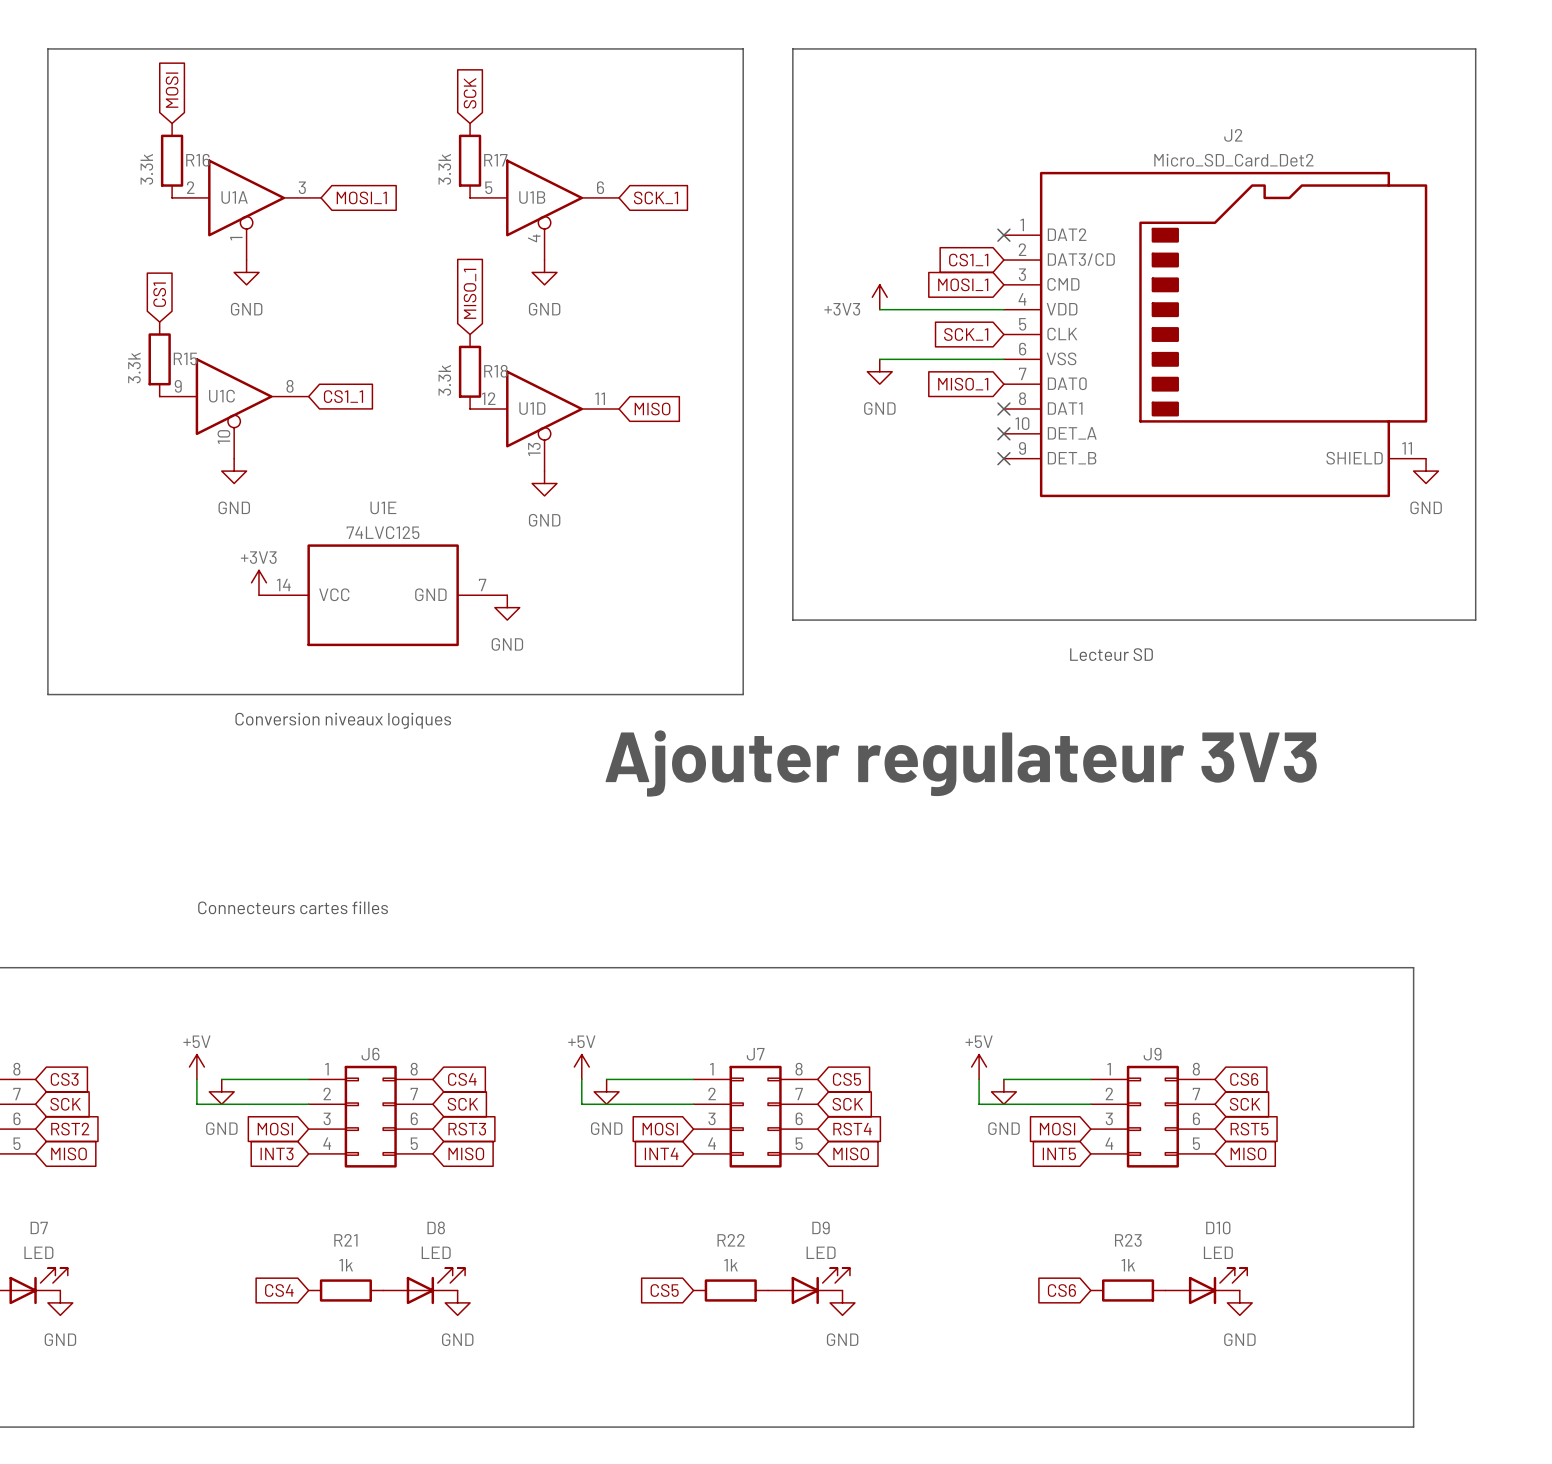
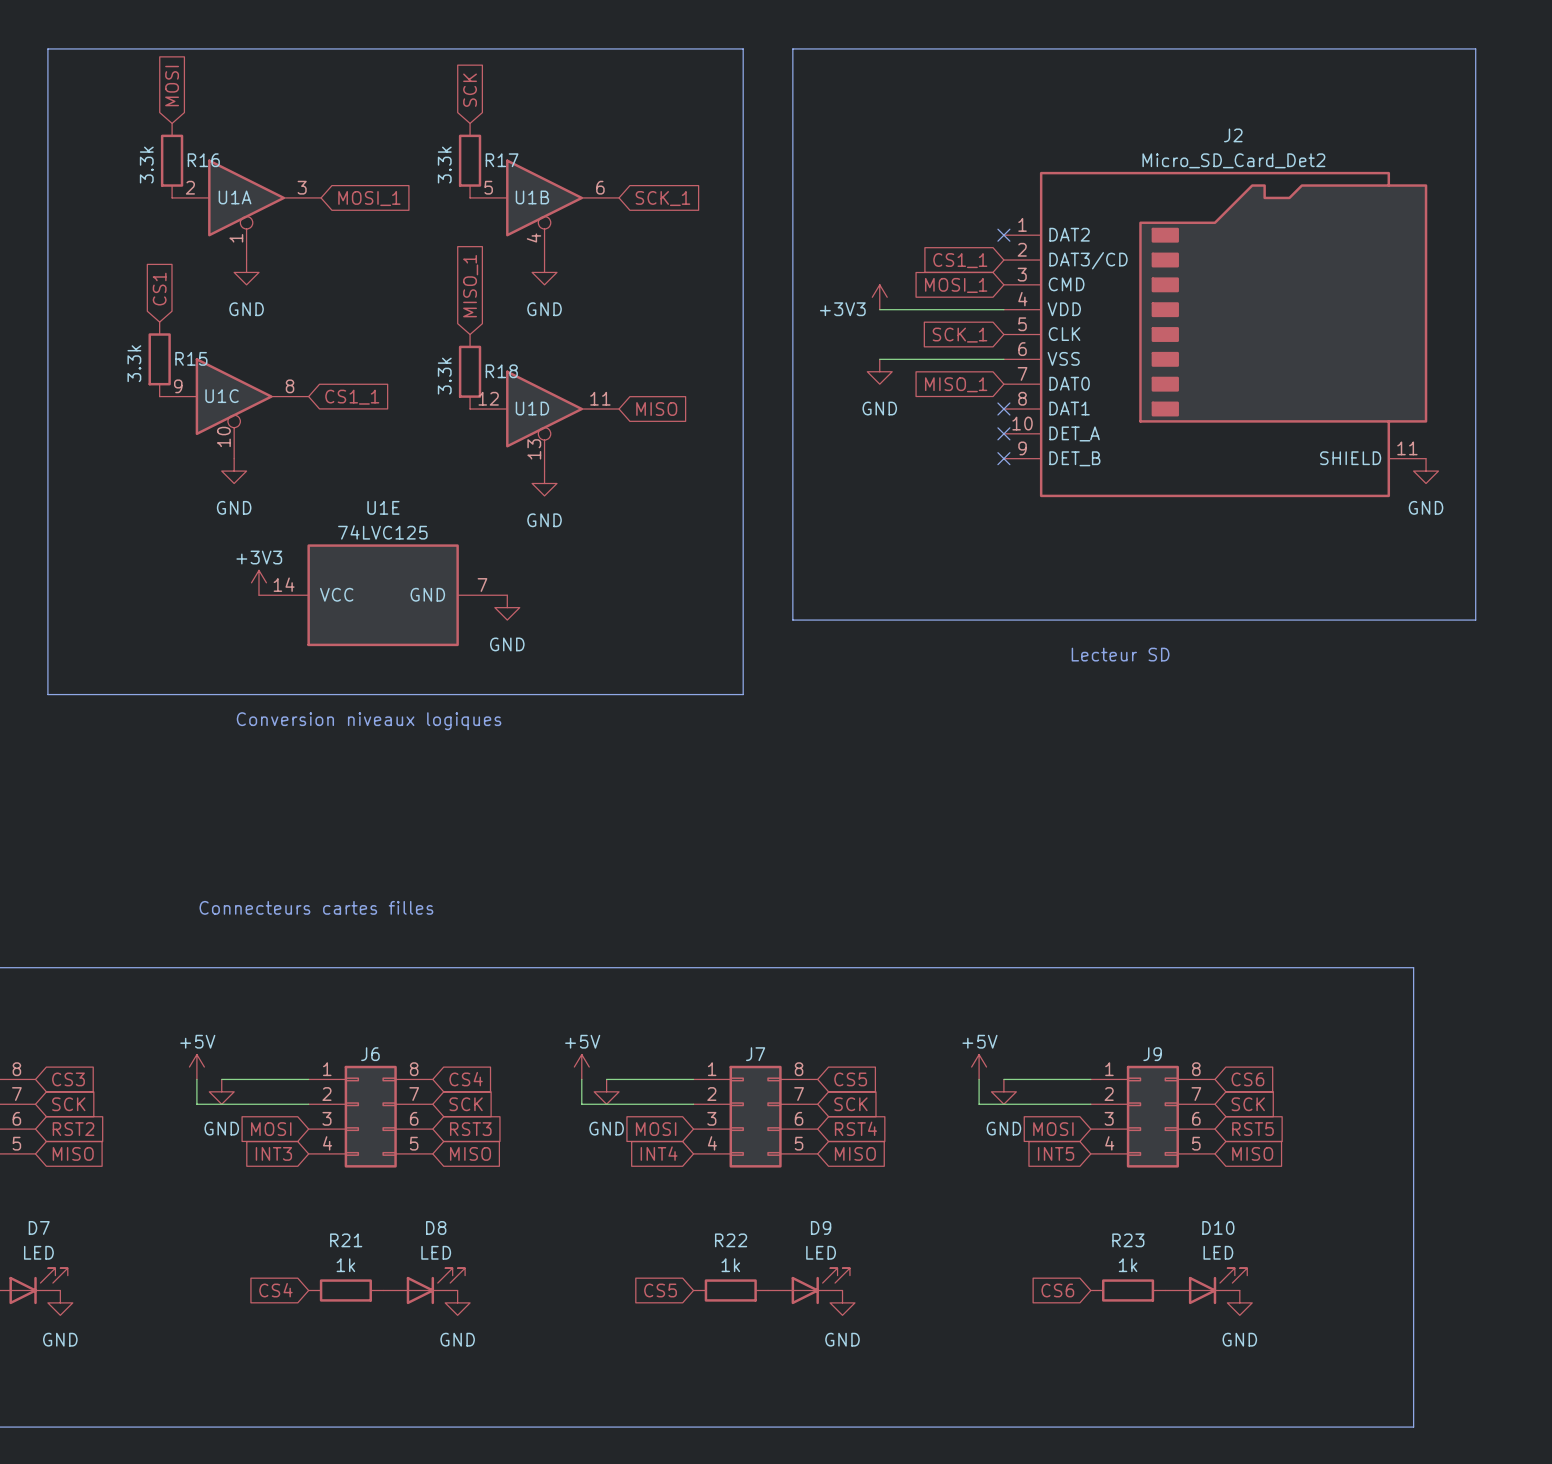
text: Ajouter regulateur 3V3 (961, 763) -> none

